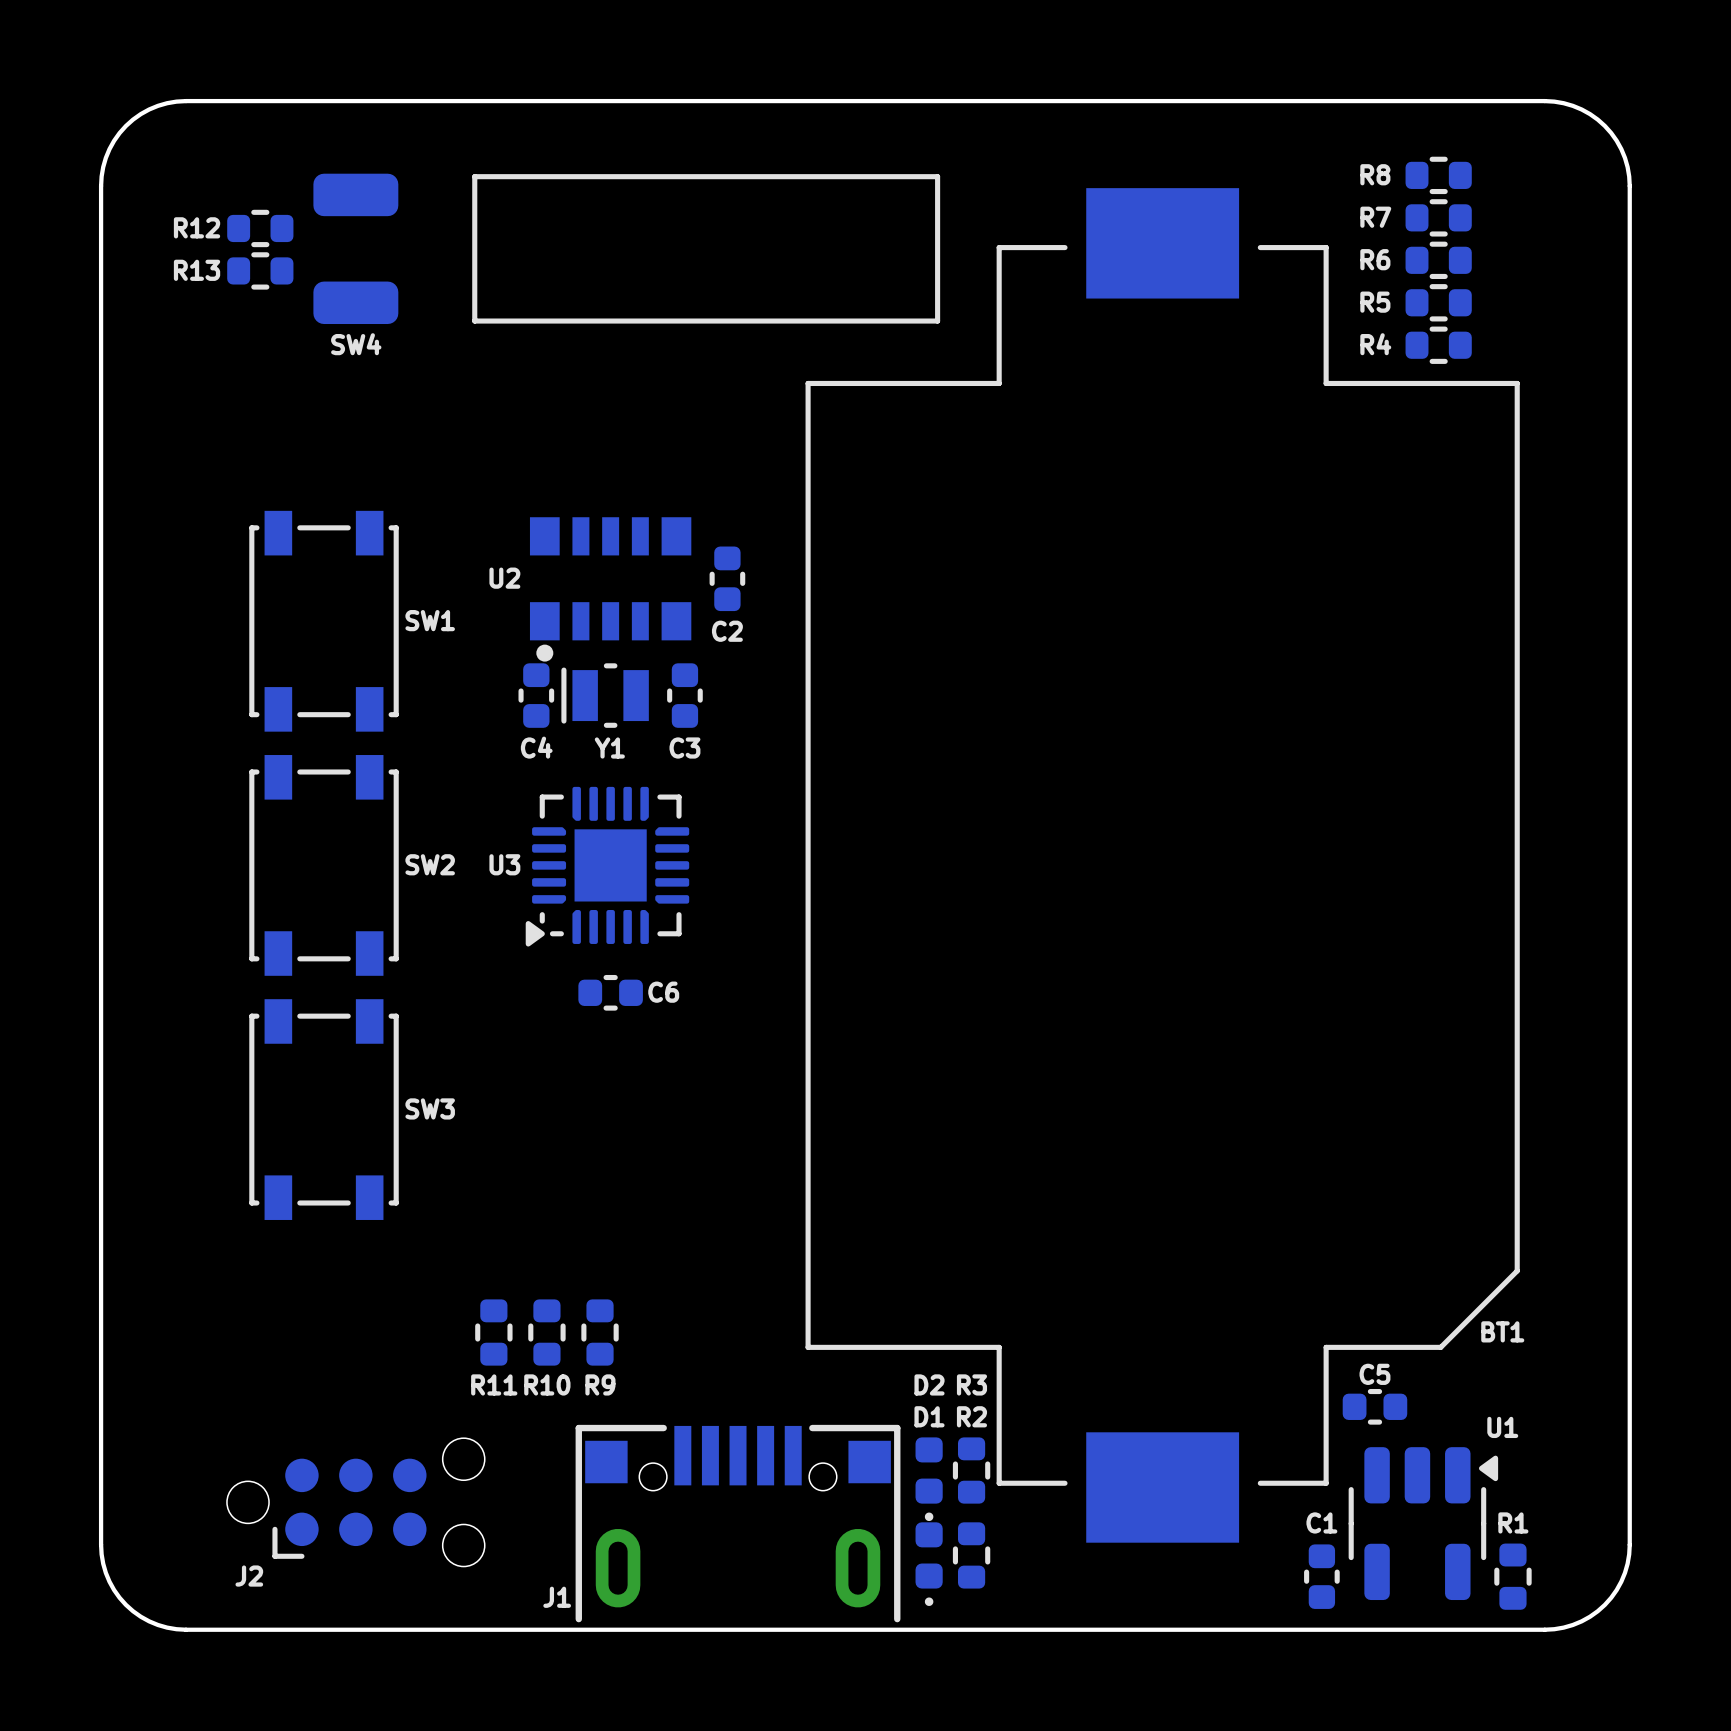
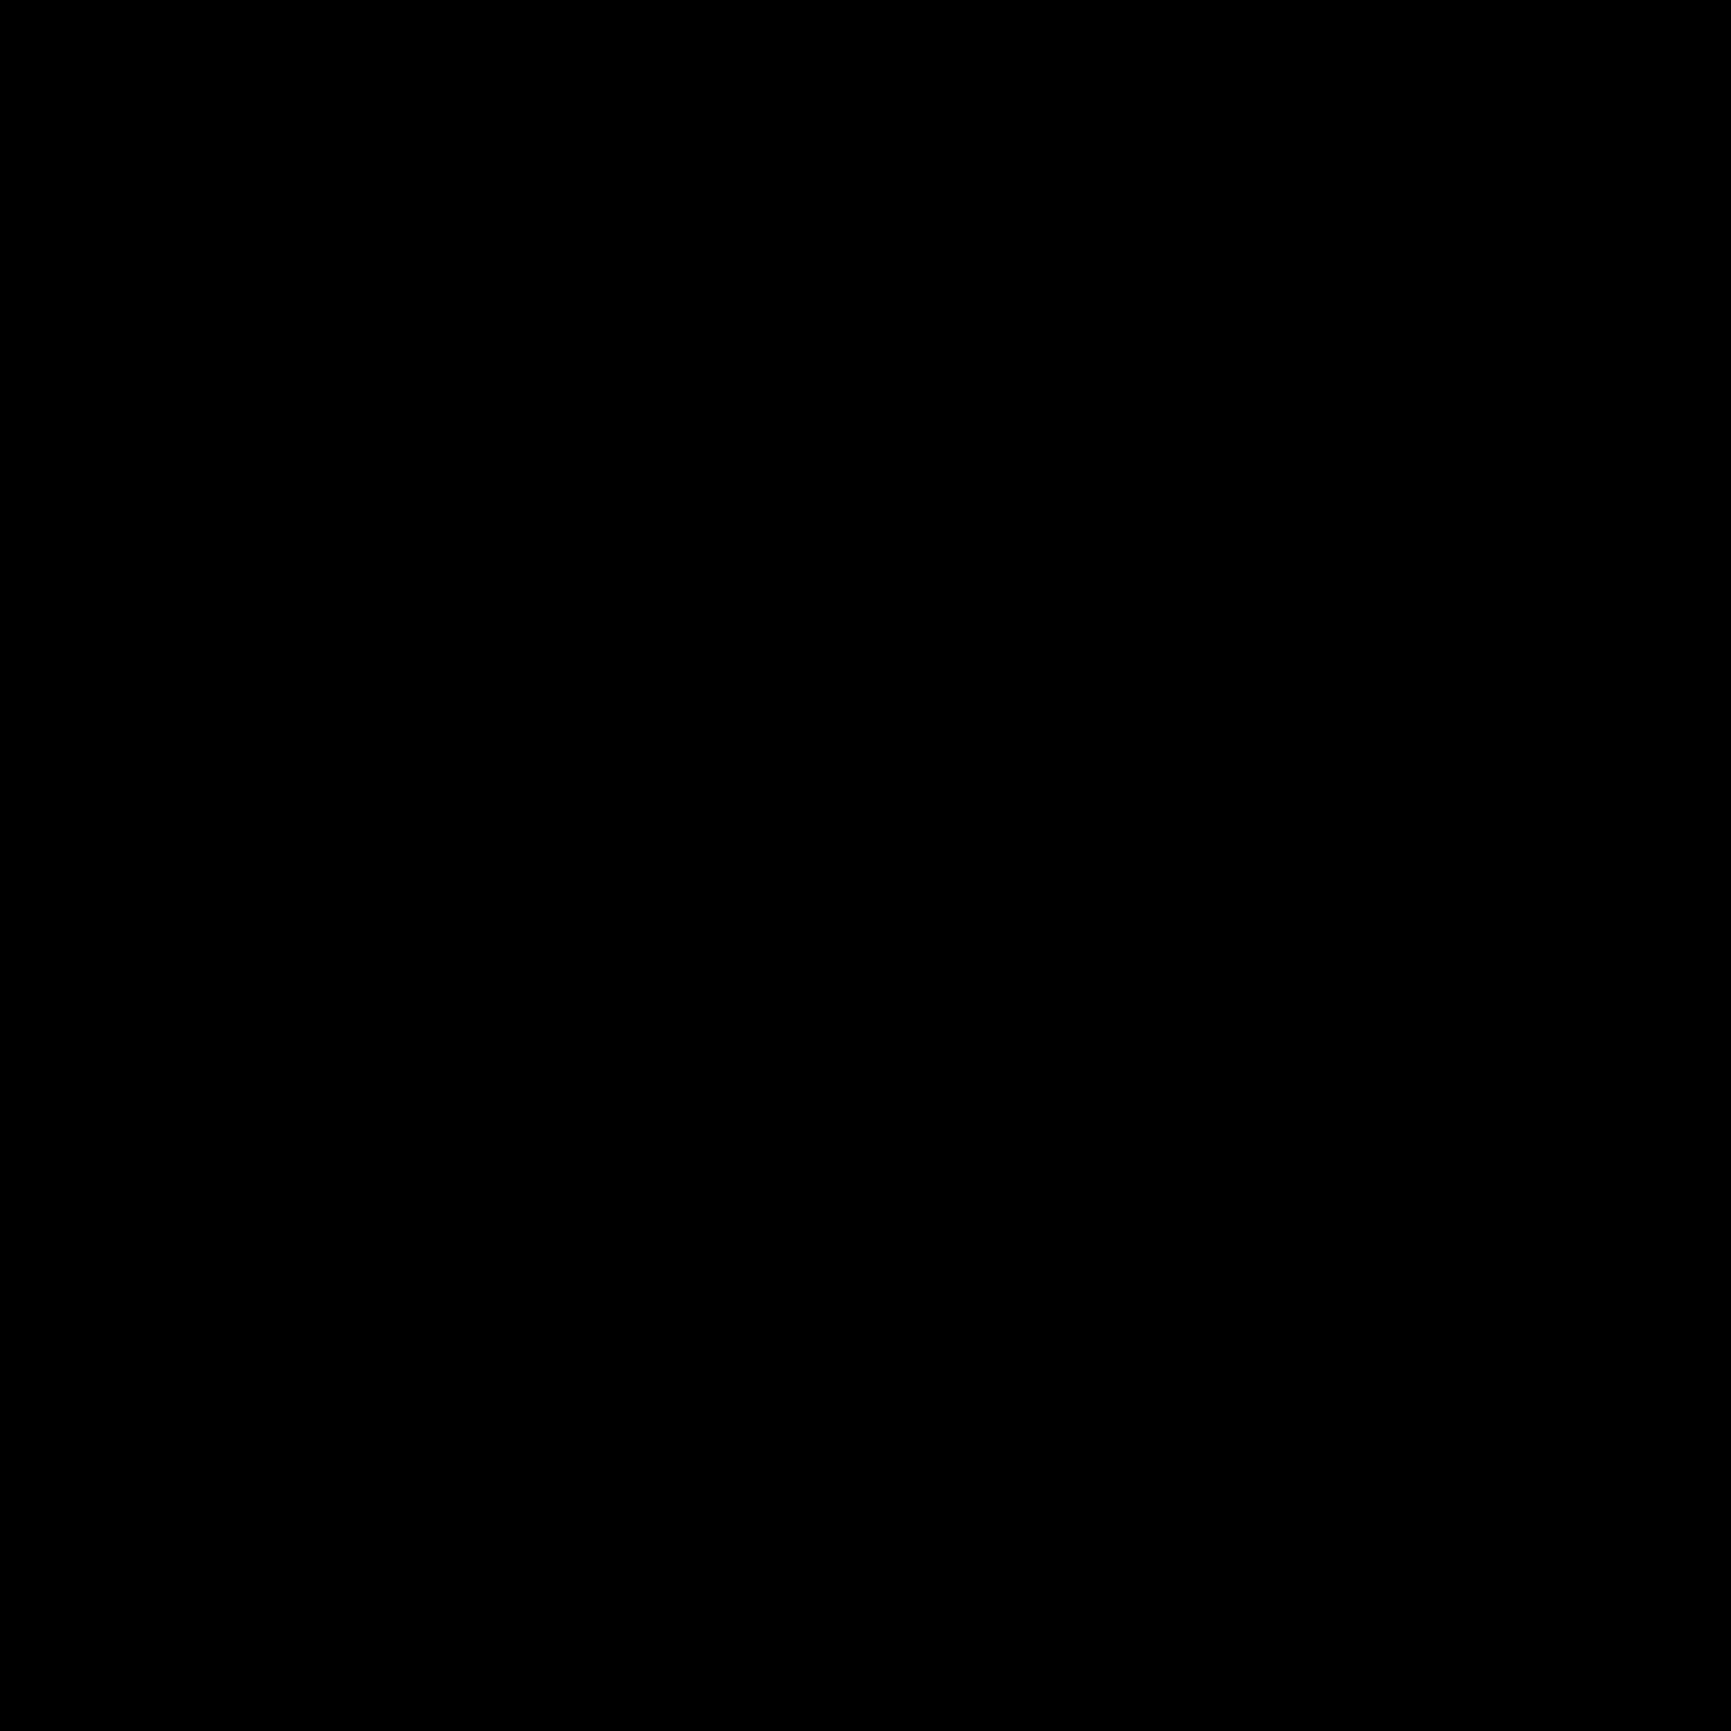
board edge: (1544, 101) (186, 101) (167, 103) (149, 109) (125, 125) (114, 140) (105, 157) (101, 186) (101, 1544) (105, 1572) (114, 1590) (125, 1604) (140, 1616) (157, 1624) (186, 1629) (1544, 1629) (1563, 1627) (1581, 1621) (1604, 1604) (1616, 1590) (1624, 1572) (1629, 1544) (1629, 186) (1627, 167) (1621, 149) (1604, 125) (1581, 109) (1563, 103) (1544, 101) -> none
R8: (1438, 175) -> none
R7: (1438, 217) -> none
R12: (260, 228) -> none
SW4: (626, 248) -> none
R6: (1438, 260) -> none
R13: (260, 270) -> none
R5: (1438, 302) -> none
R4: (1438, 345) -> none
C2: (727, 578) -> none
U2: (610, 589) -> none
SW1: (324, 621) -> none
C4: (536, 695) -> none
Y1: (605, 695) -> none
C3: (684, 695) -> none
SW2: (324, 865) -> none
BT1: (1162, 865) -> none
U3: (607, 866) -> none
C6: (610, 992) -> none
SW3: (324, 1109) -> none
R11: (493, 1332) -> none
R10: (546, 1332) -> none
R9: (600, 1332) -> none
C5: (1374, 1406) -> none
R3: (971, 1470) -> none
D2: (929, 1479) -> none
J2: (355, 1502) -> none
J1: (738, 1523) -> none
U1: (1423, 1523) -> none
R2: (971, 1555) -> none
D1: (929, 1564) -> none
C1: (1321, 1576) -> none
R1: (1512, 1576) -> none

